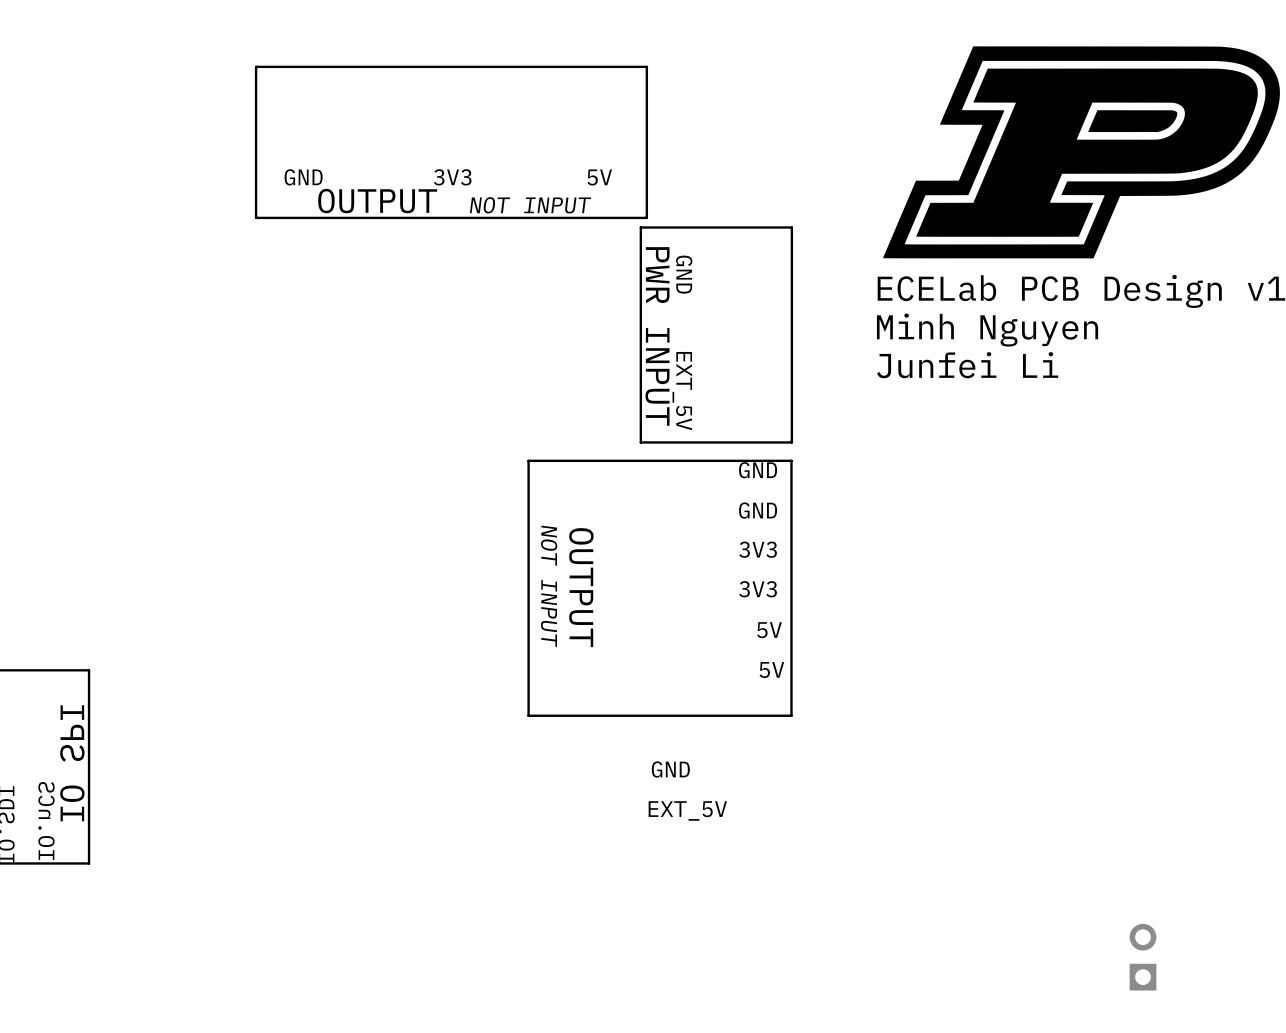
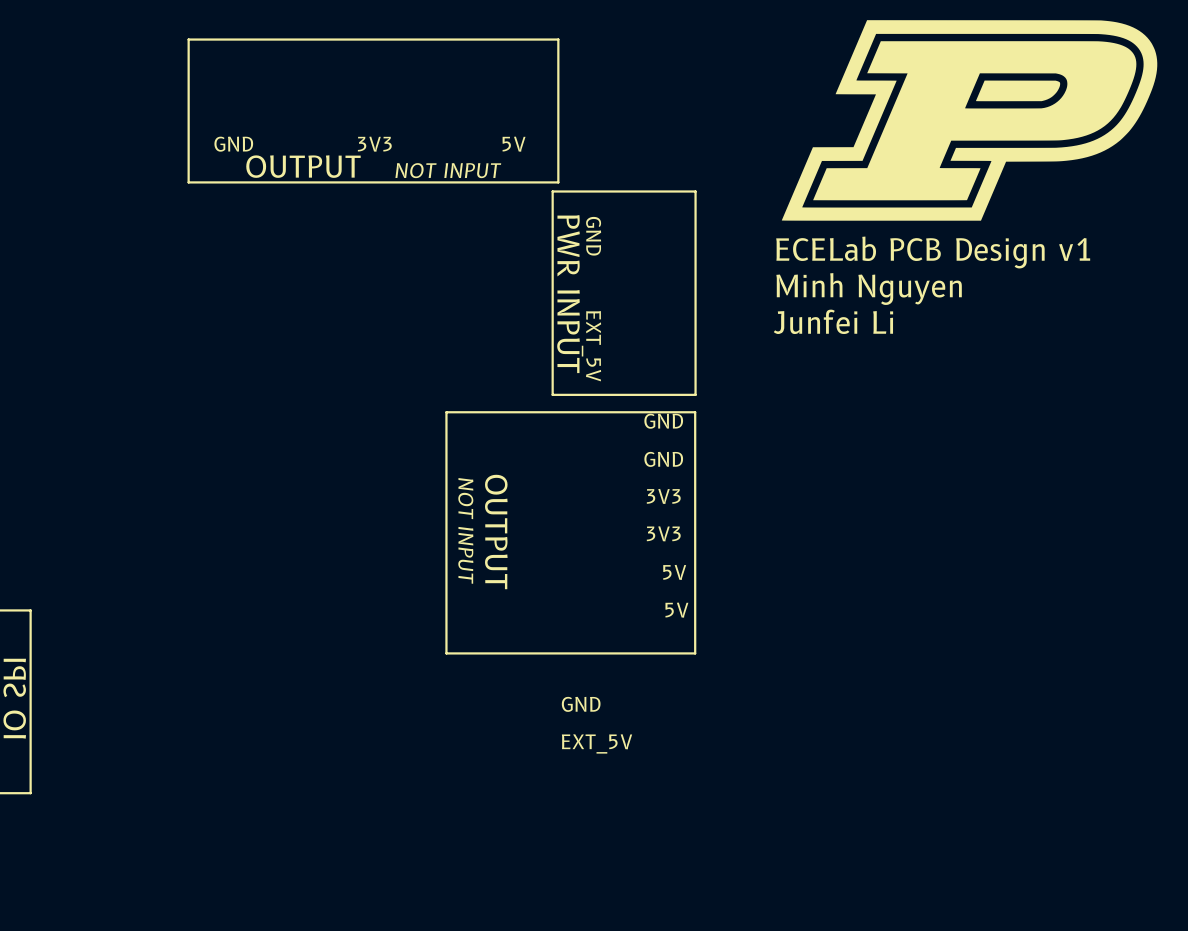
part: (1143, 957) -> none

